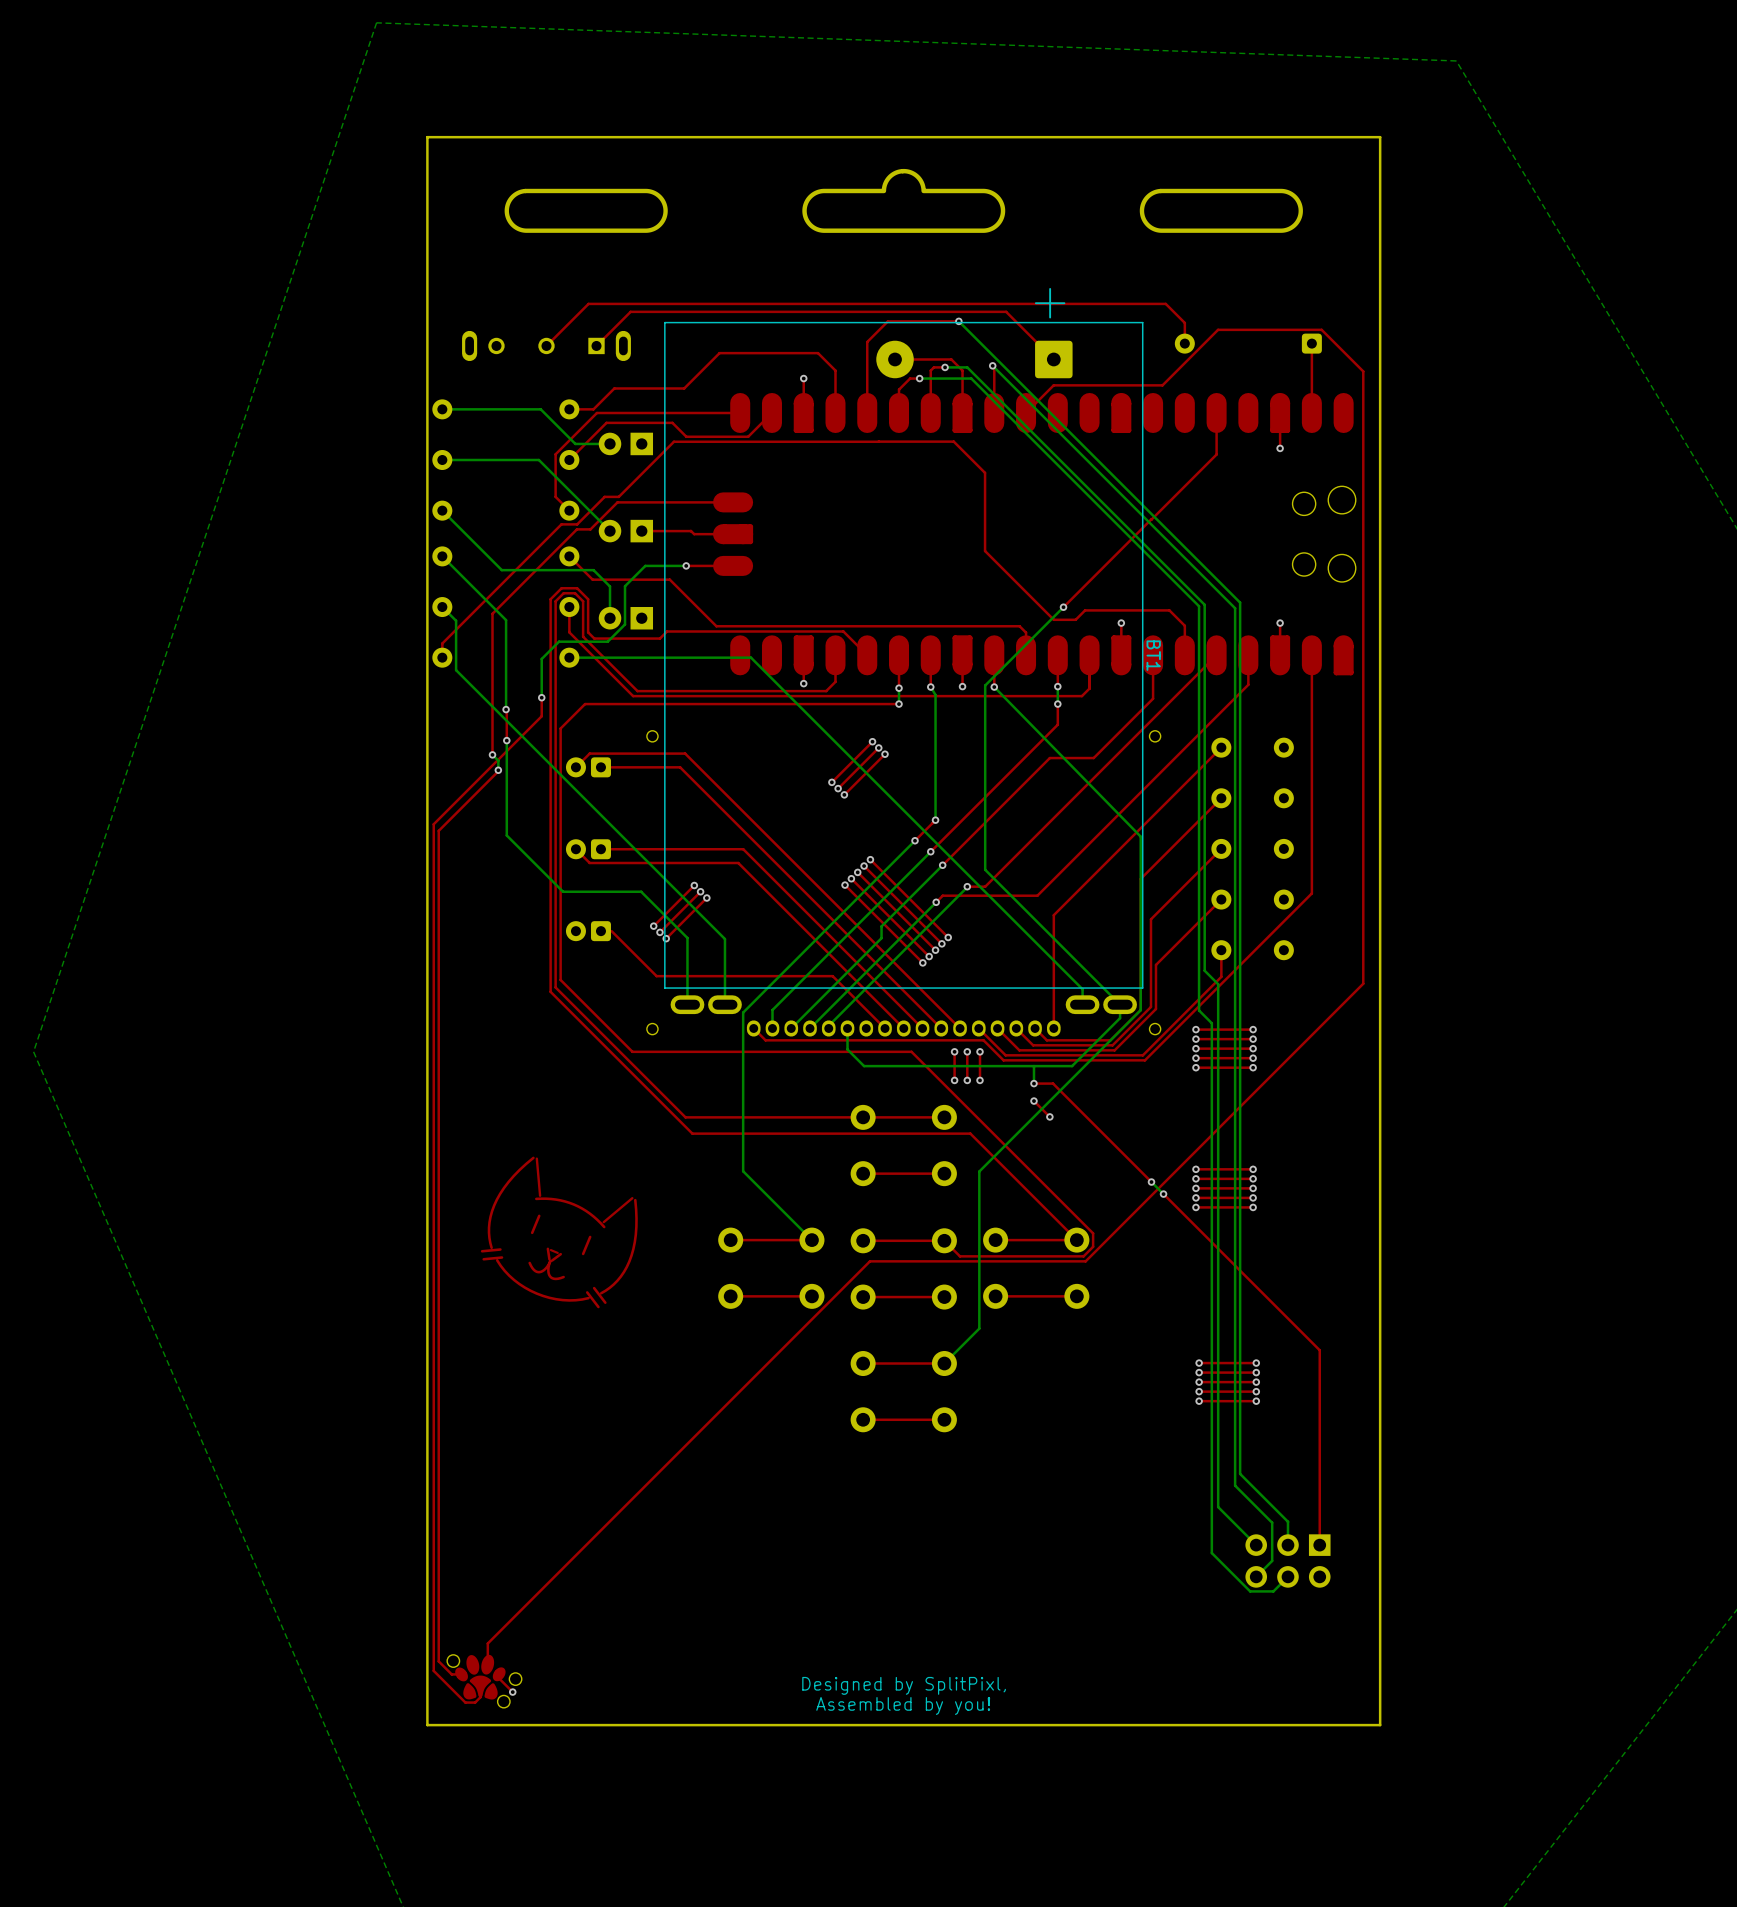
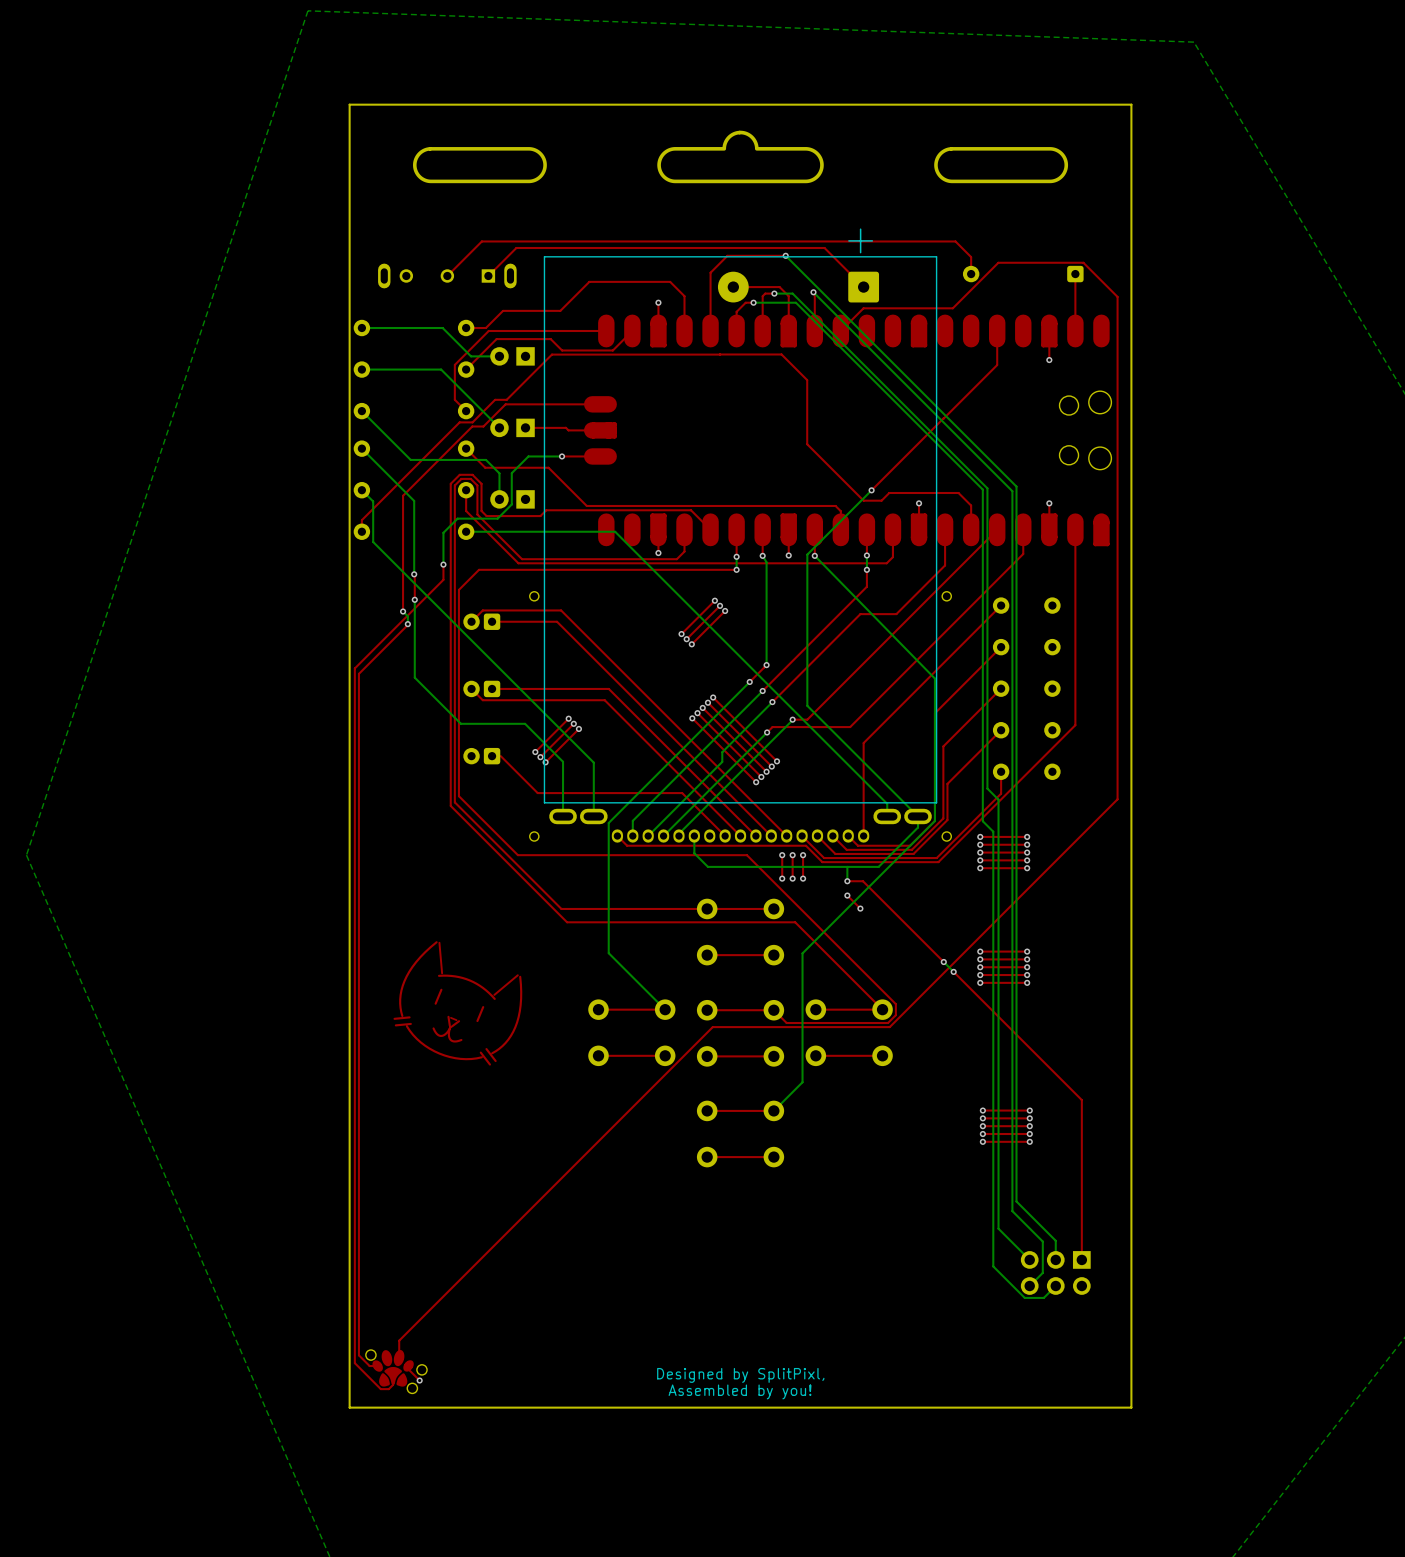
BT1 name: BT1 (1153, 655) -> none

